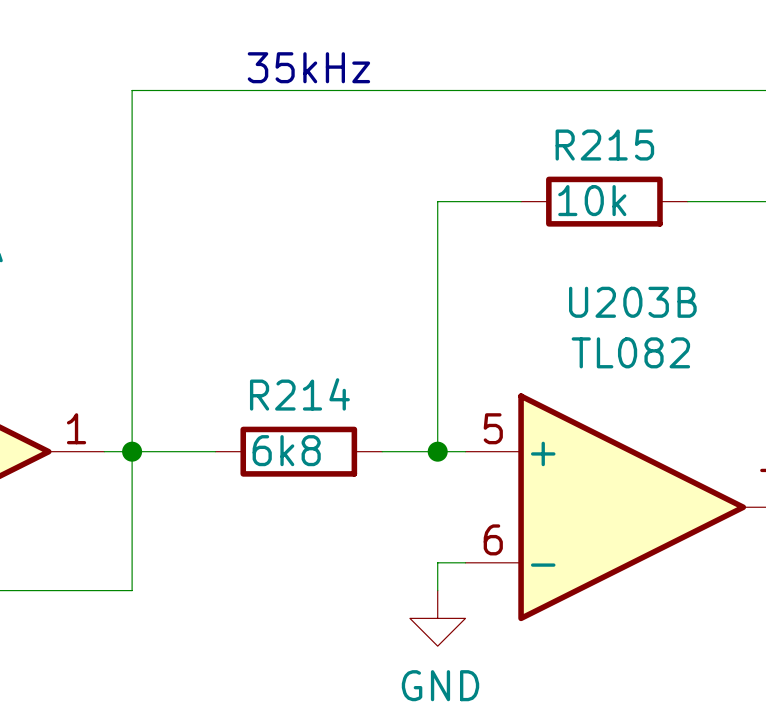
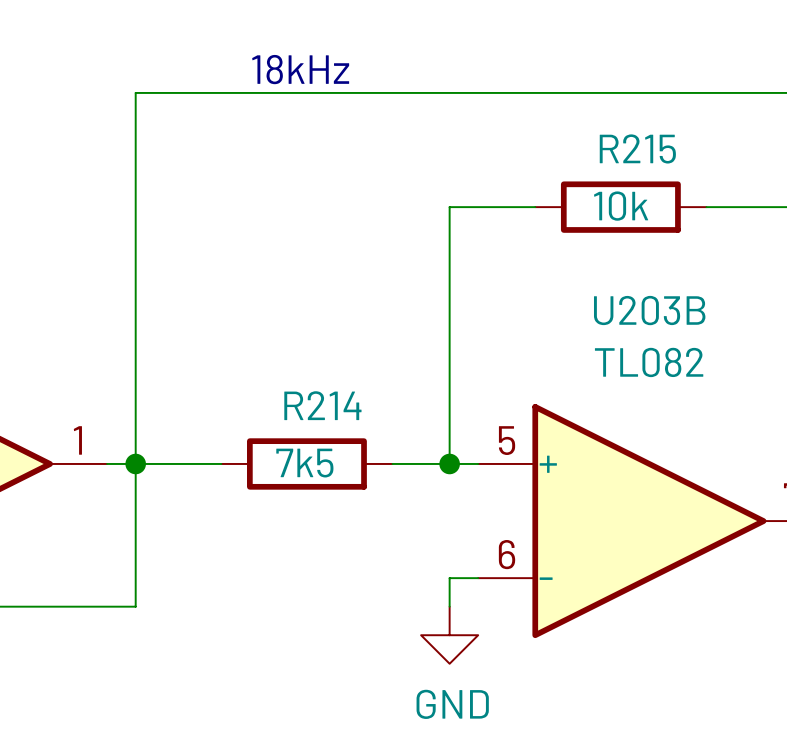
text: 35kHz (308, 67) -> 18kHz (300, 69)
R214 value: 6k8 (286, 450) -> 7k5 (304, 463)

